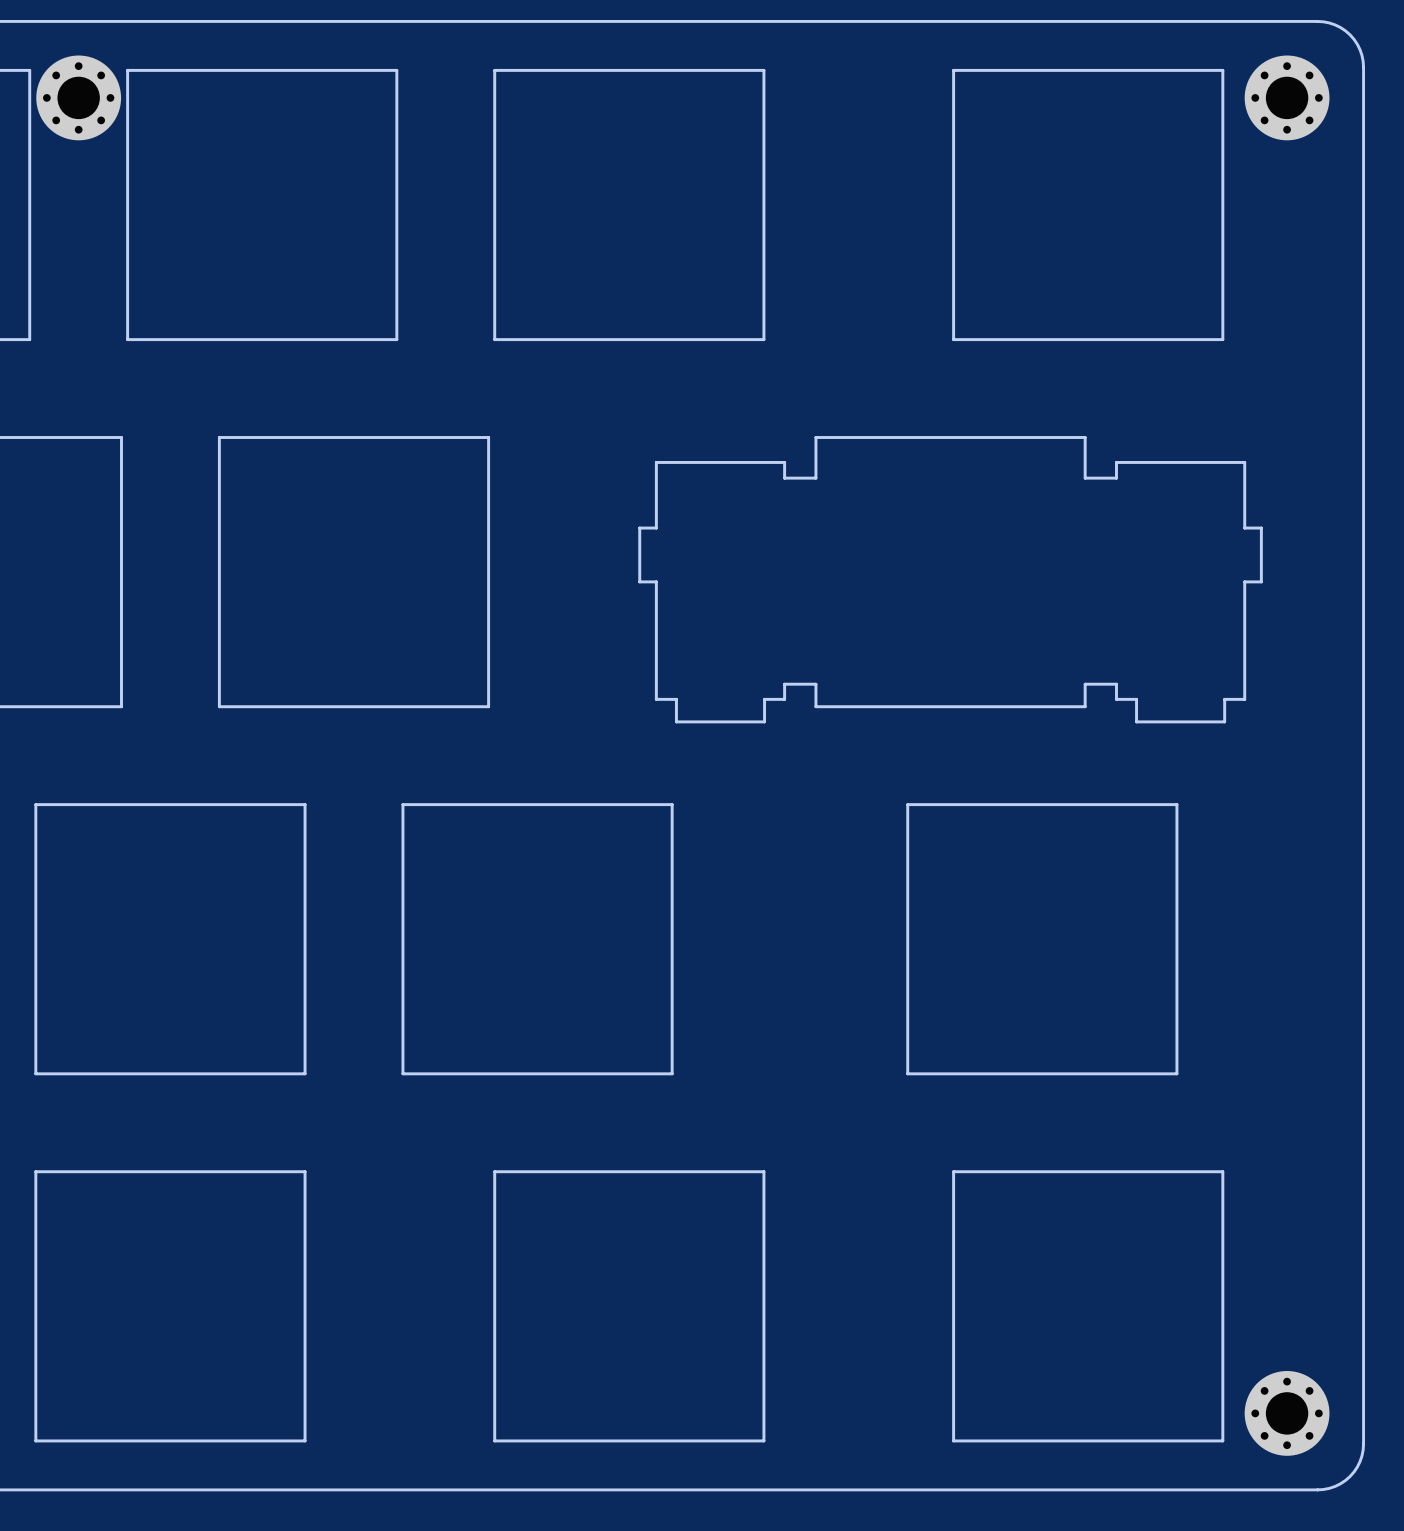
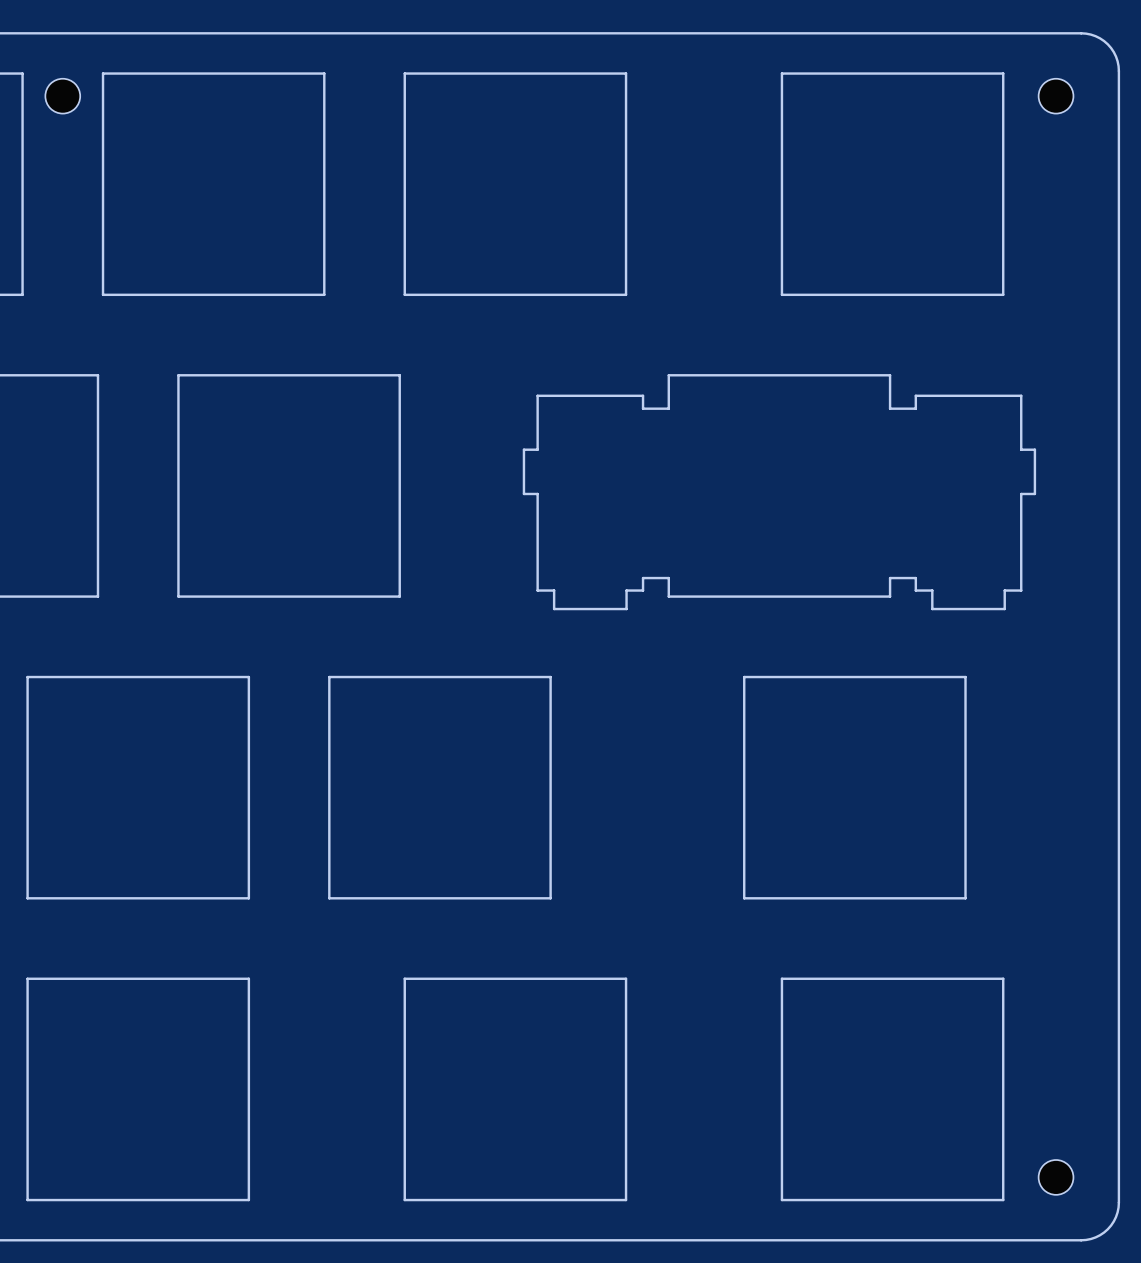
part footprint: [36, 55, 122, 141] -> [45, 78, 81, 114]
part footprint: [1244, 55, 1330, 141] -> [1038, 78, 1074, 114]
part footprint: [1244, 1371, 1330, 1456] -> [1038, 1160, 1074, 1195]

